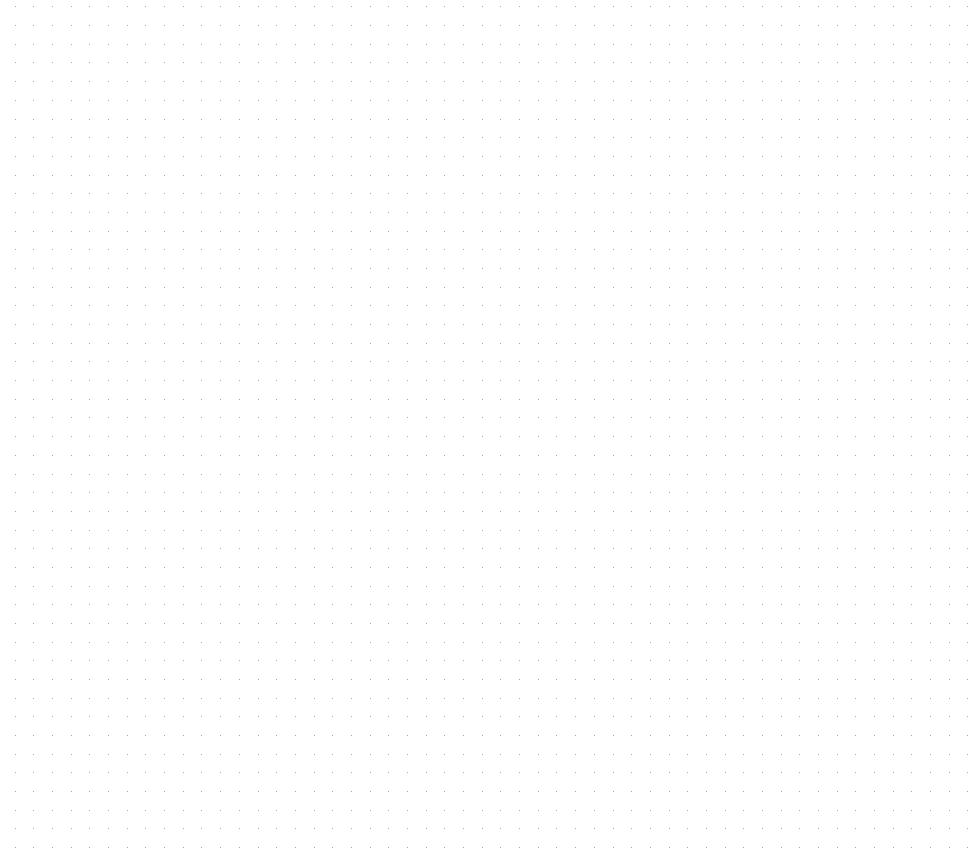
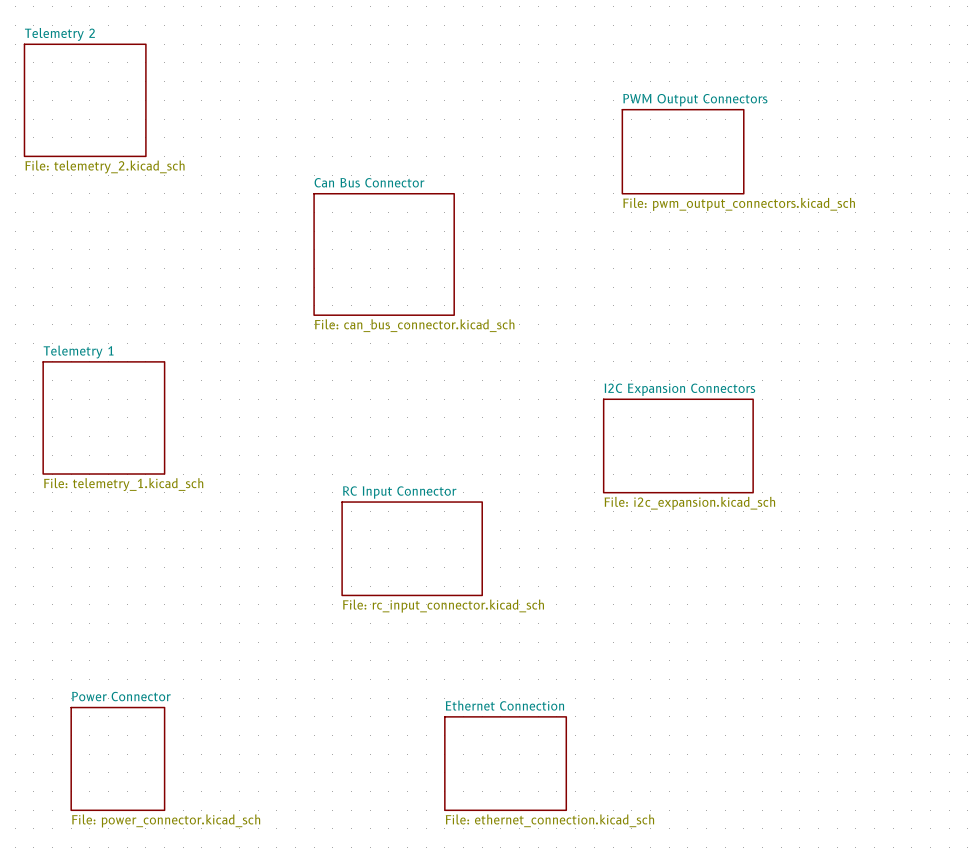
sheet Telemetry 2: none -> File: telemetry_2.kicad_sch (85, 100)
sheet PWM Output Connectors: none -> File: pwm_output_connectors.kicad_sch (683, 151)
sheet Can Bus Connector: none -> File: can_bus_connector.kicad_sch (384, 254)
sheet Telemetry 1: none -> File: telemetry_1.kicad_sch (103, 417)
sheet I2C Expansion Connectors: none -> File: i2c_expansion.kicad_sch (678, 445)
sheet RC Input Connector: none -> File: rc_input_connector.kicad_sch (412, 548)
sheet Power Connector: none -> File: power_connector.kicad_sch (117, 758)
sheet Ethernet Connection: none -> File: ethernet_connection.kicad_sch (505, 763)

